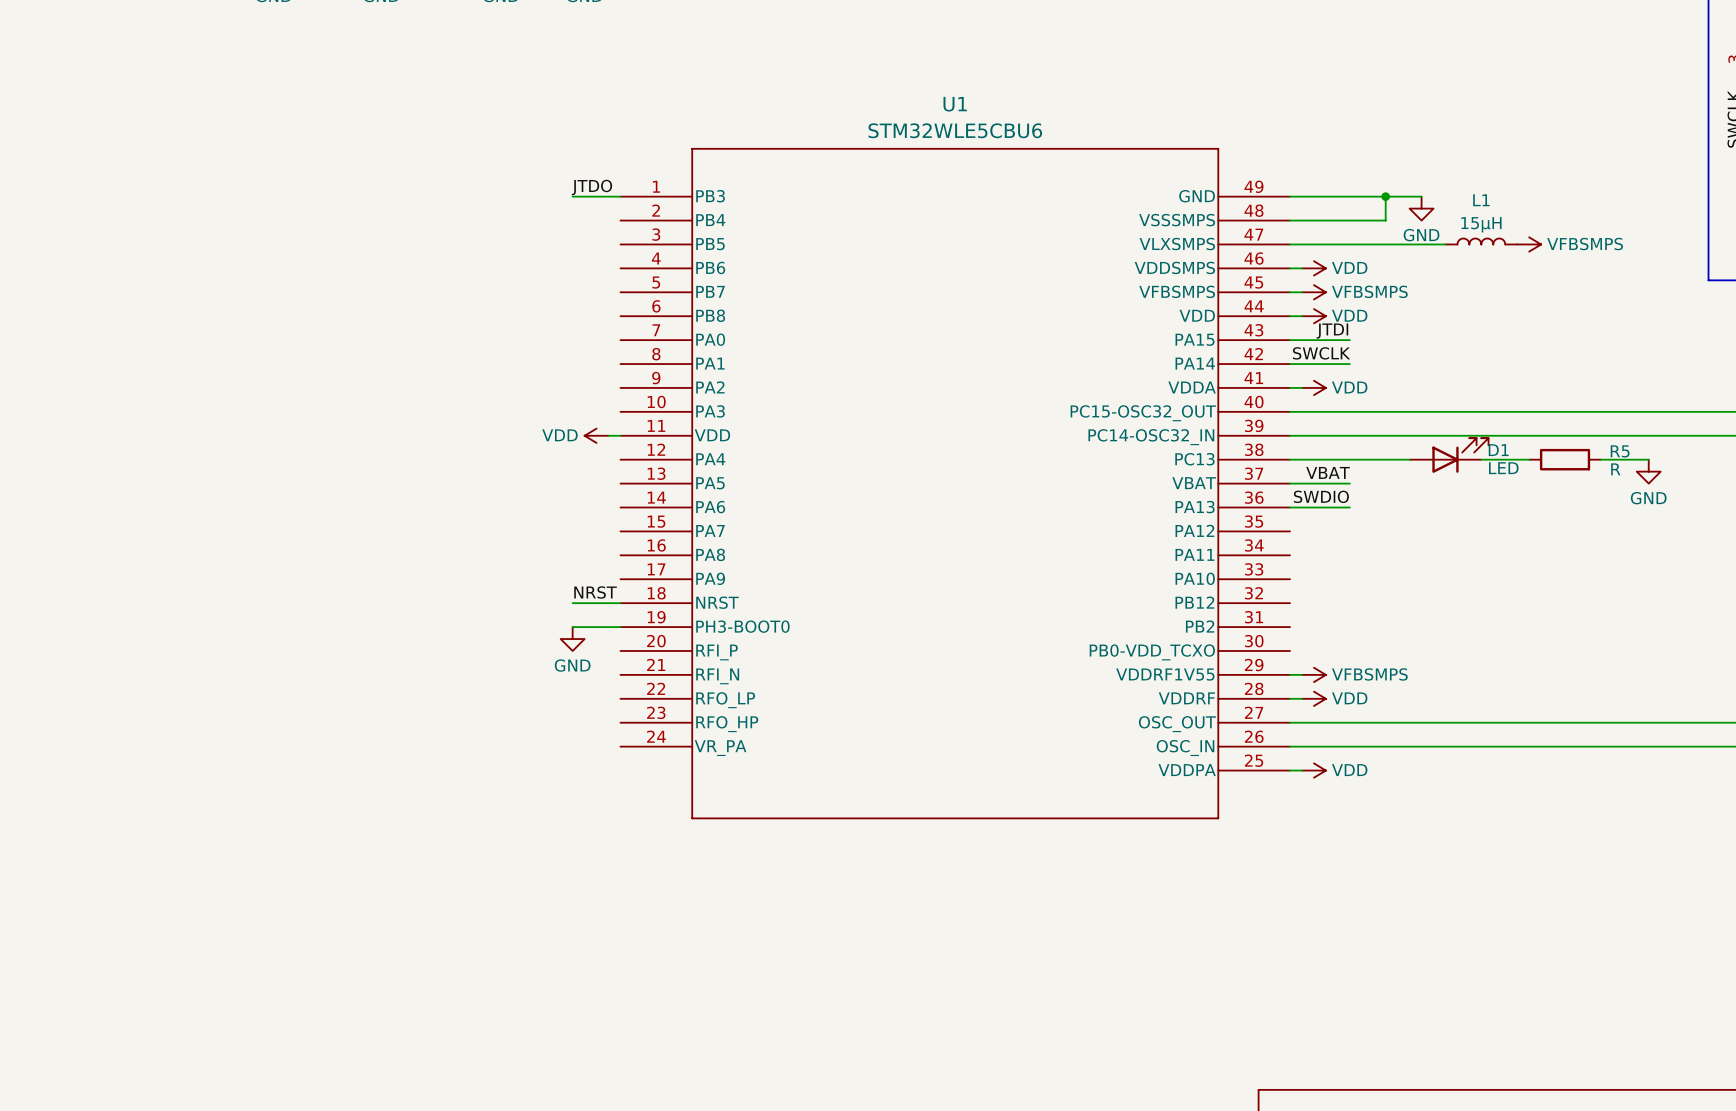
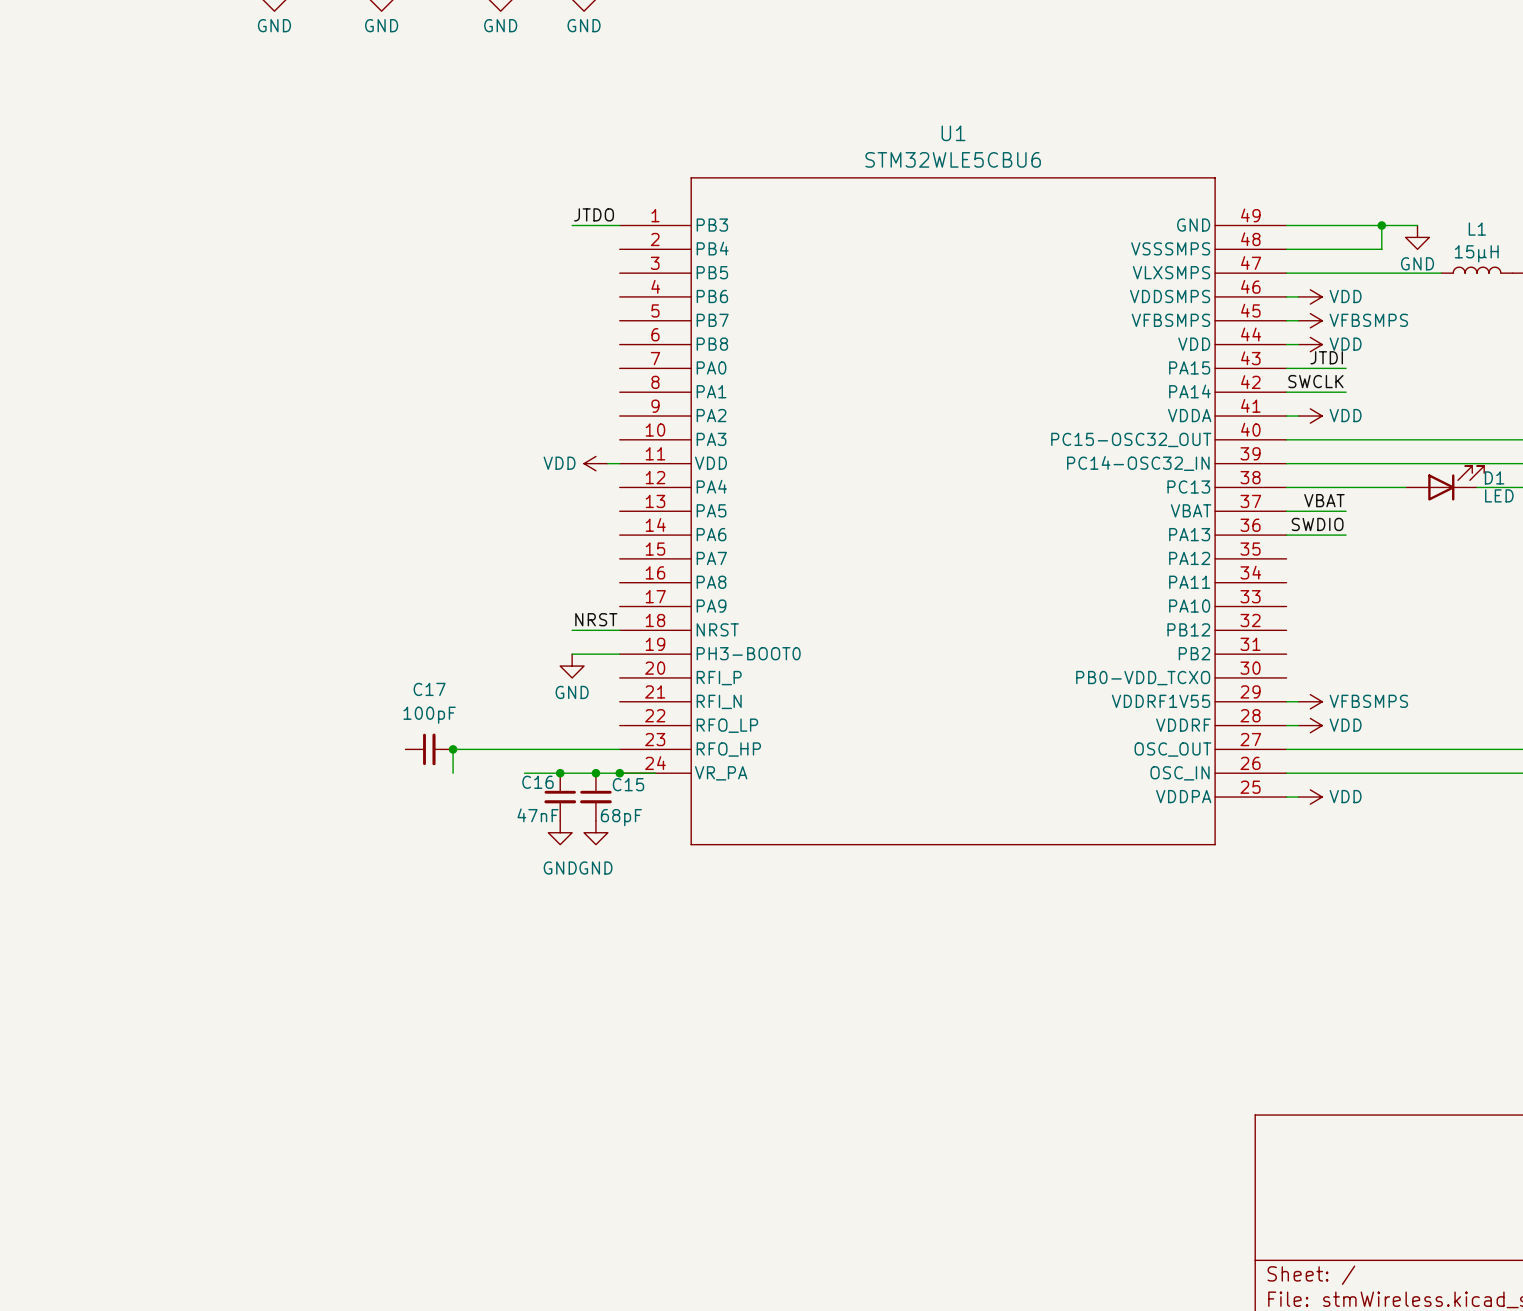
C17: none -> 100pF (429, 749)
junction: none -> (453, 749)
wire: none -> (619, 749) (453, 749) (453, 773)
wire: none -> (524, 773) (655, 773)
junction: none -> (560, 773)
junction: none -> (595, 773)
junction: none -> (619, 773)
C16: none -> 47nF (560, 797)
C15: none -> 68pF (595, 797)
power symbol: none -> GND (560, 832)
power symbol: none -> GND (595, 832)

